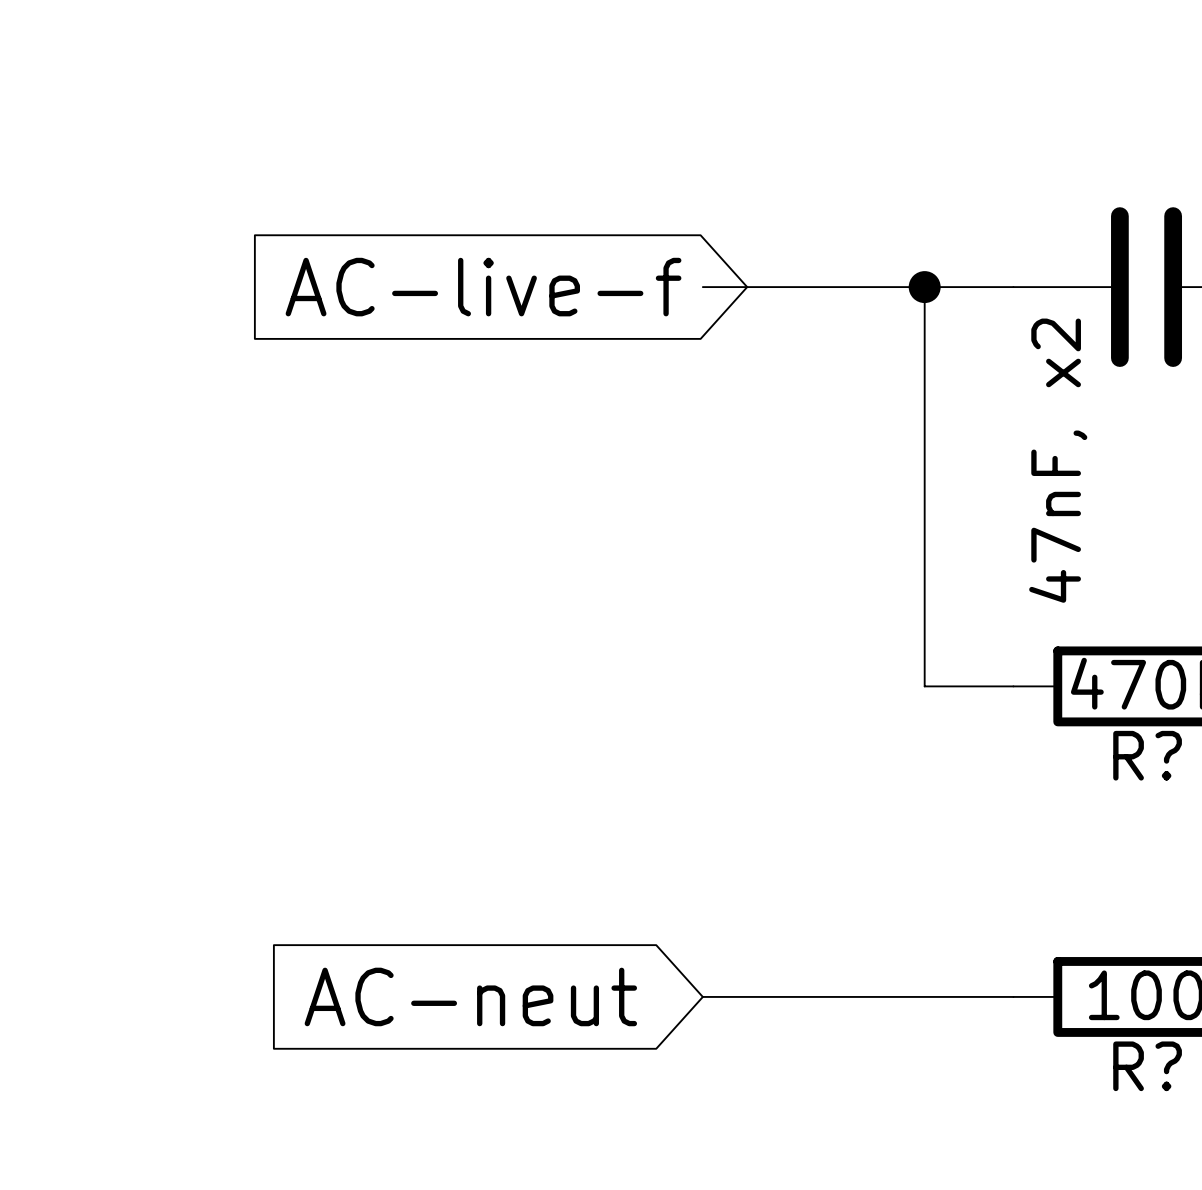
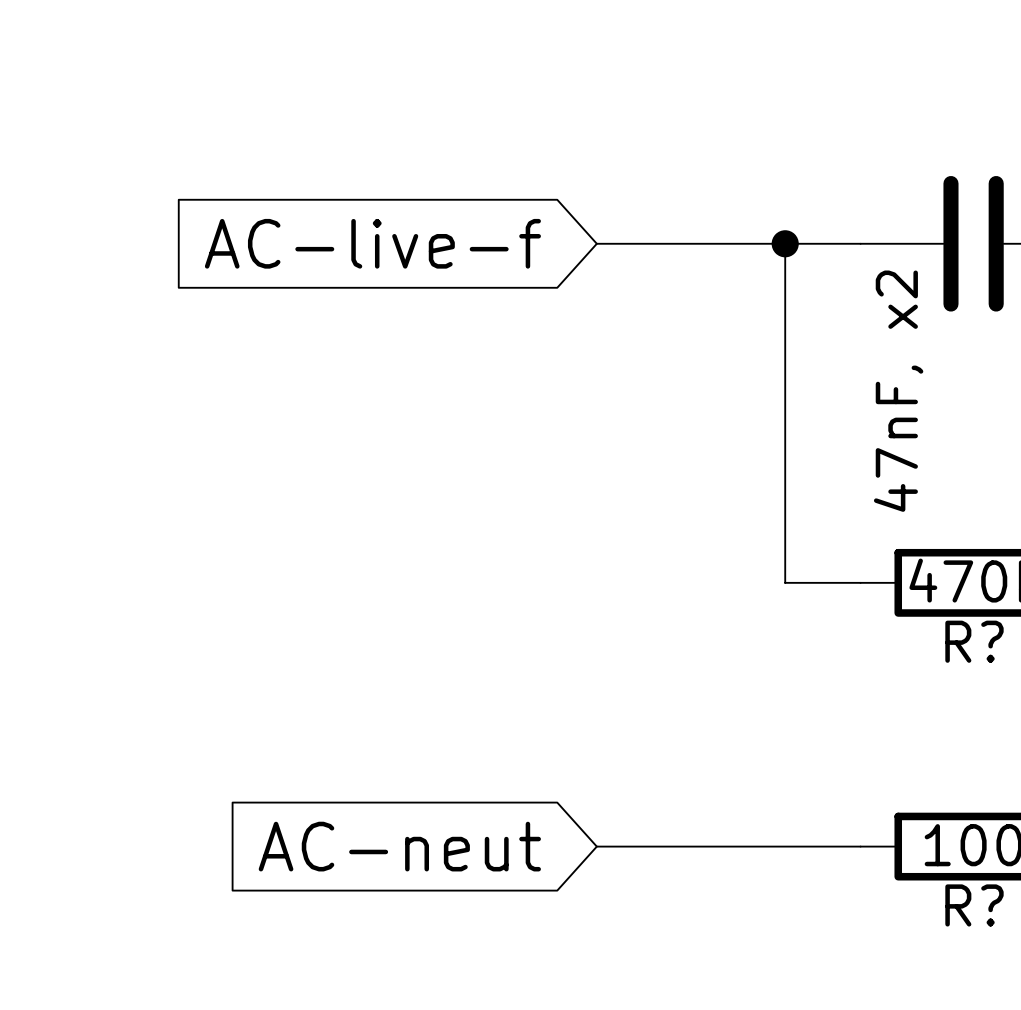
global label position: AC-live-f (483, 287) -> AC-live-f (372, 243)

